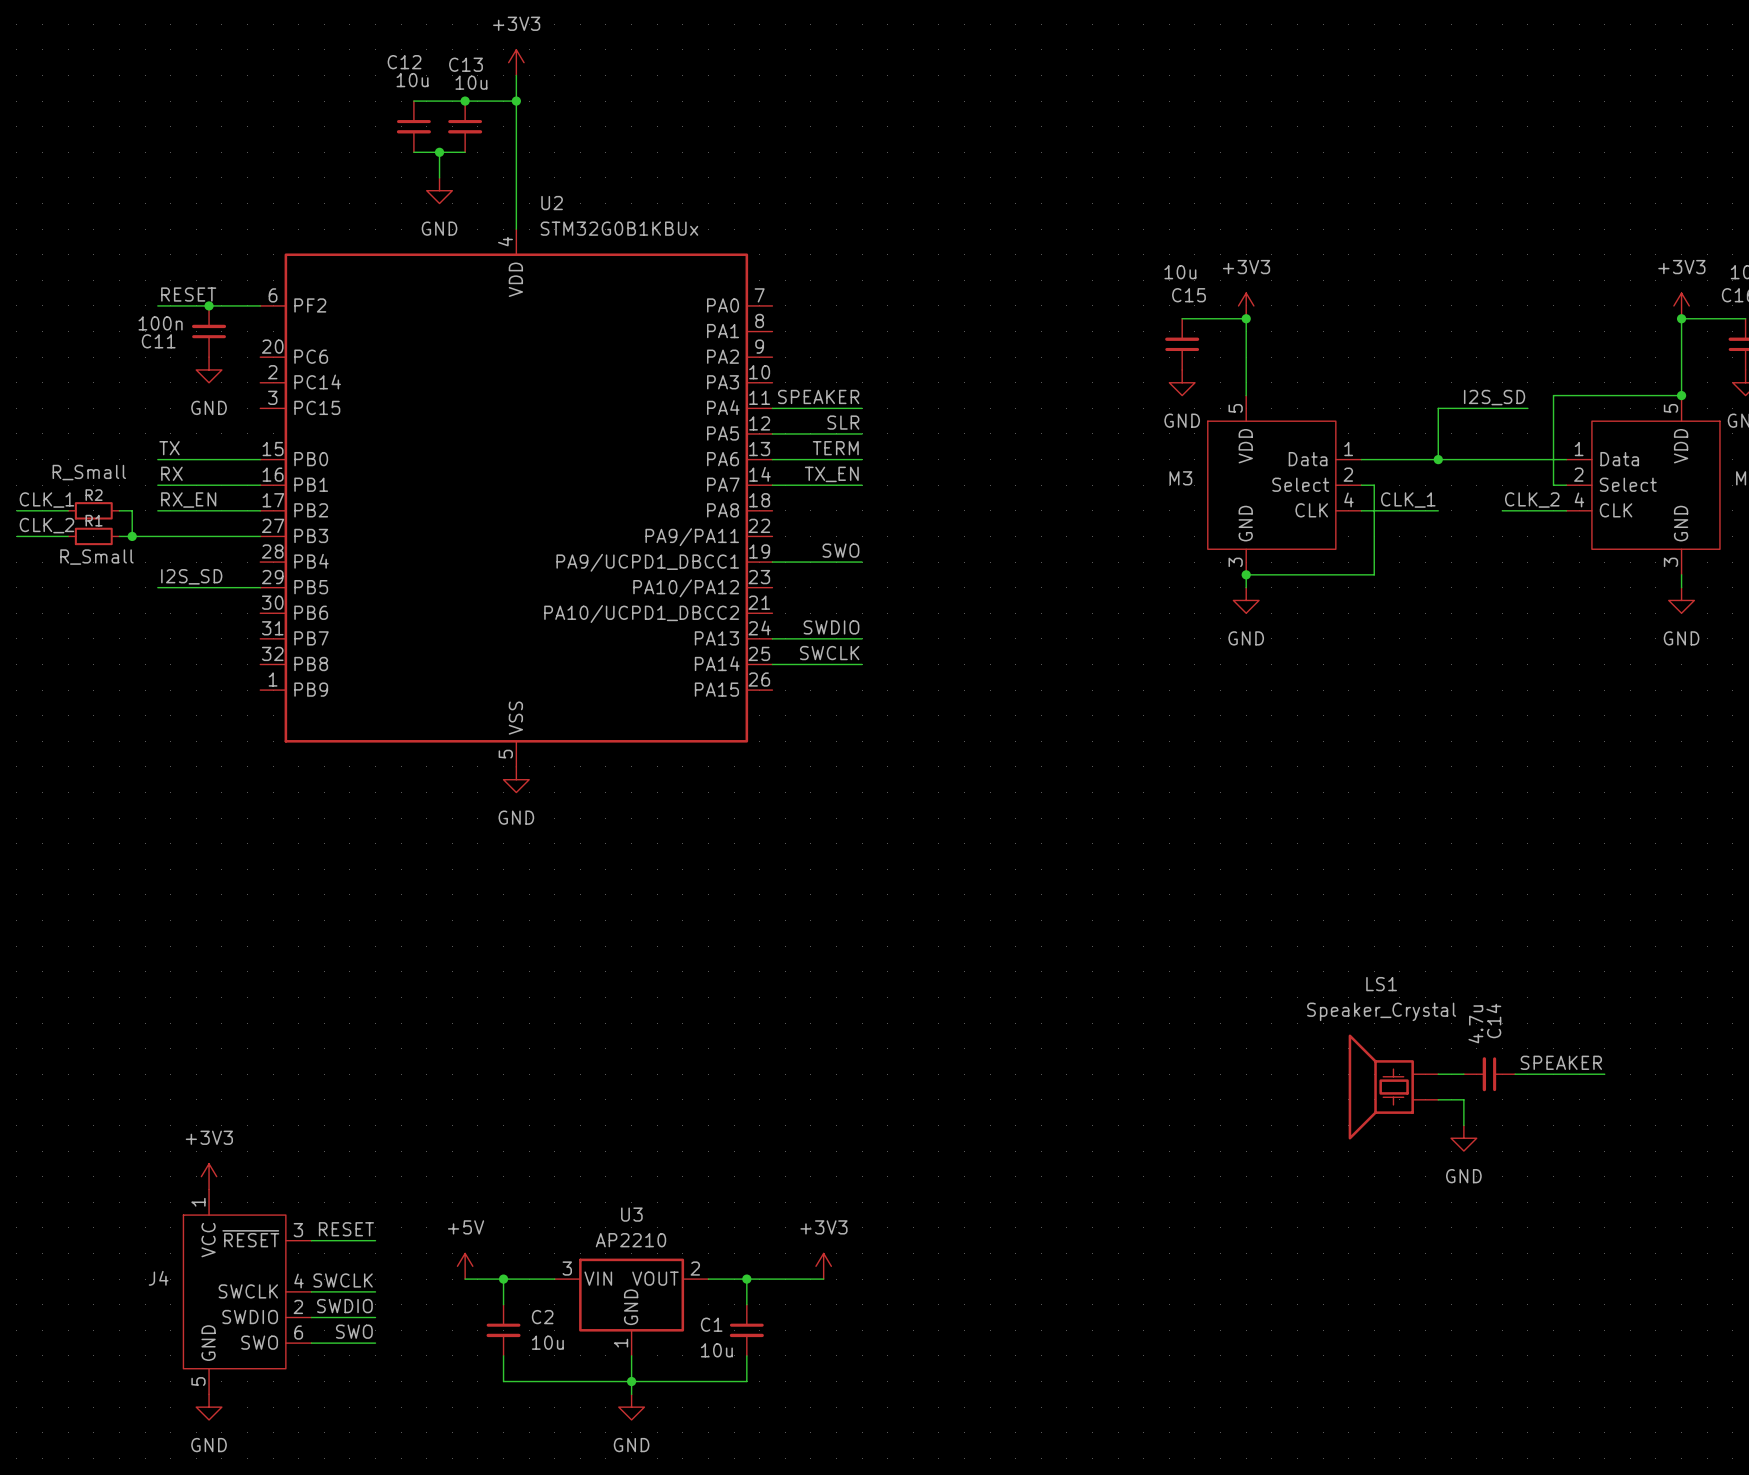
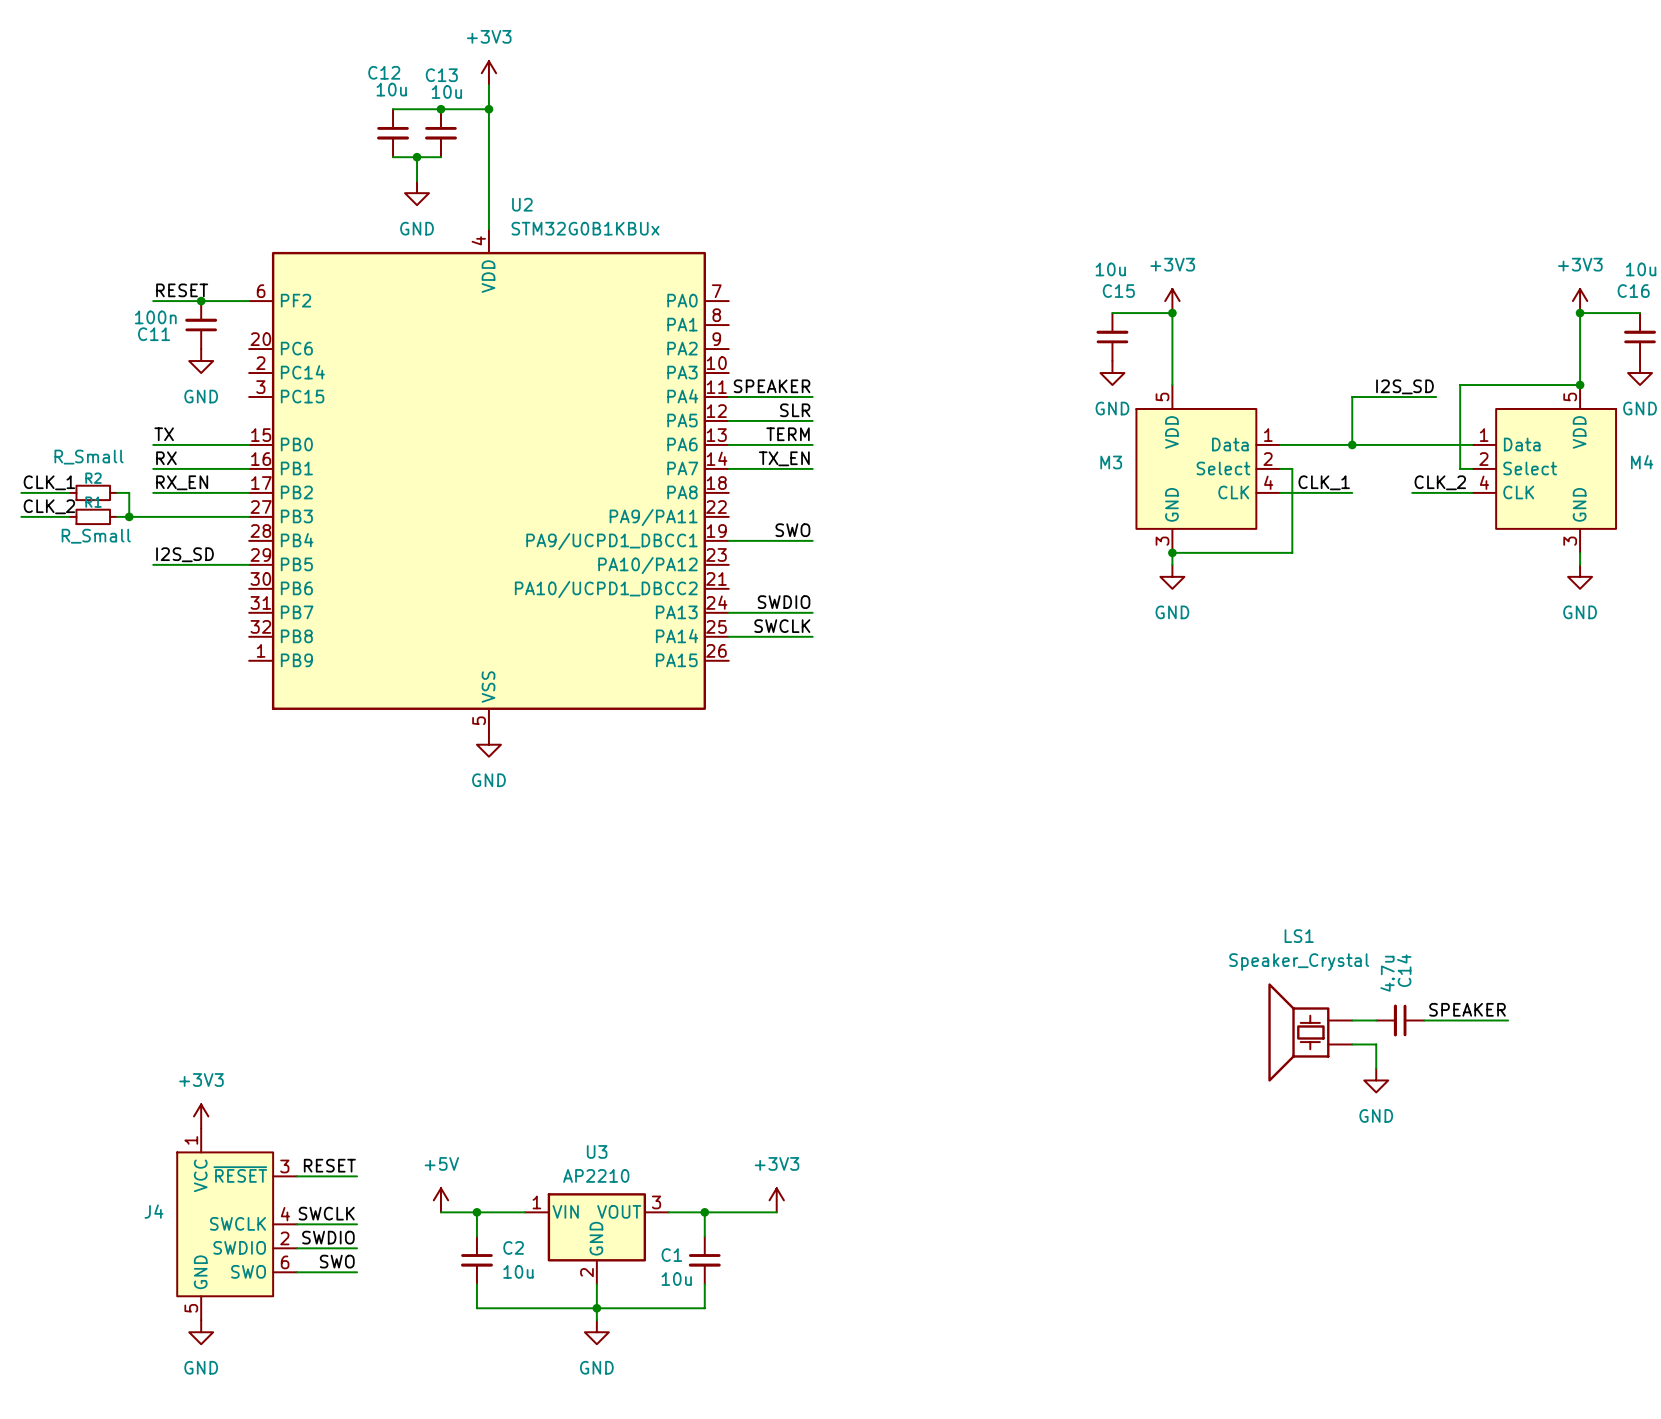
U3 pin number: 3 (567, 1268) -> 1 (536, 1202)
U3 pin number: 2 (695, 1268) -> 3 (656, 1202)
U3 pin number: 1 (621, 1343) -> 2 (586, 1272)

